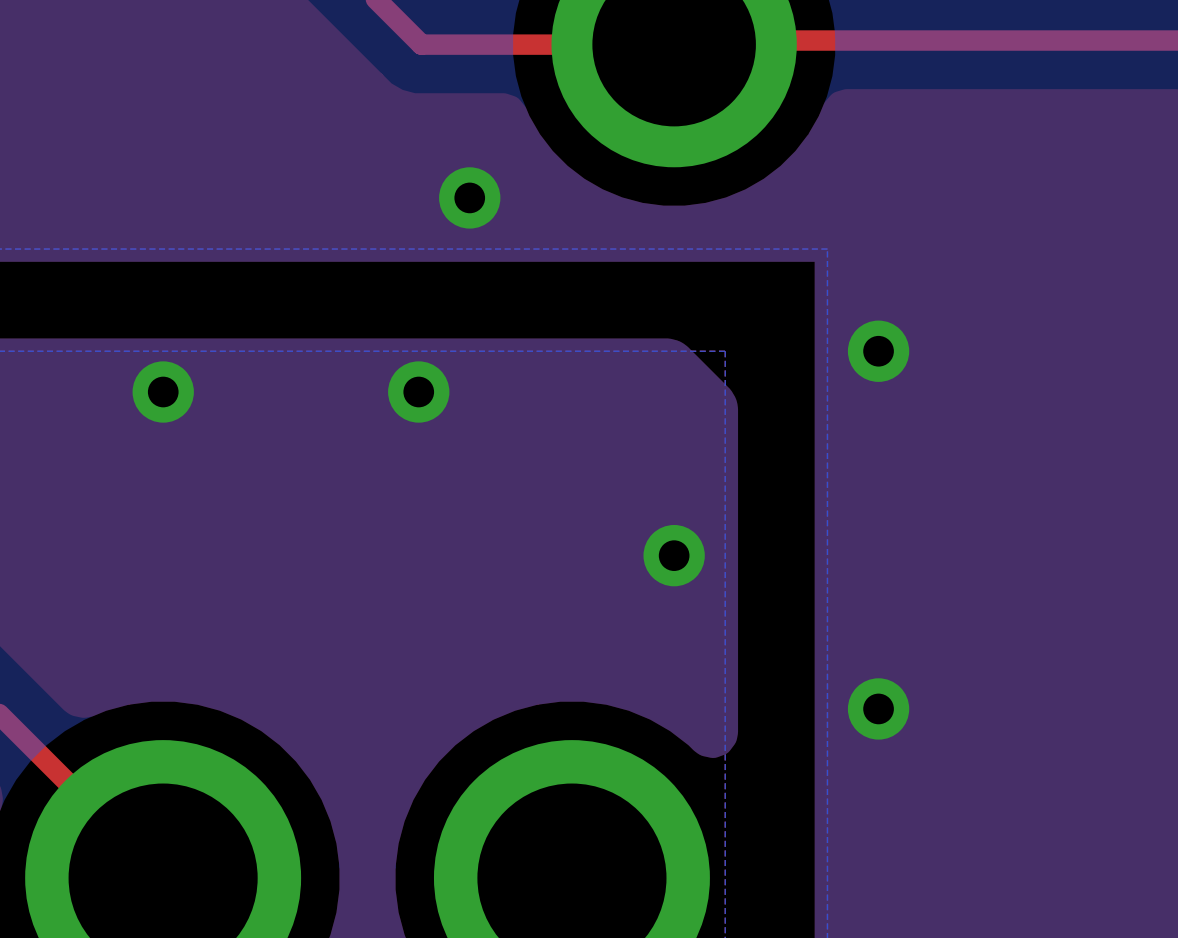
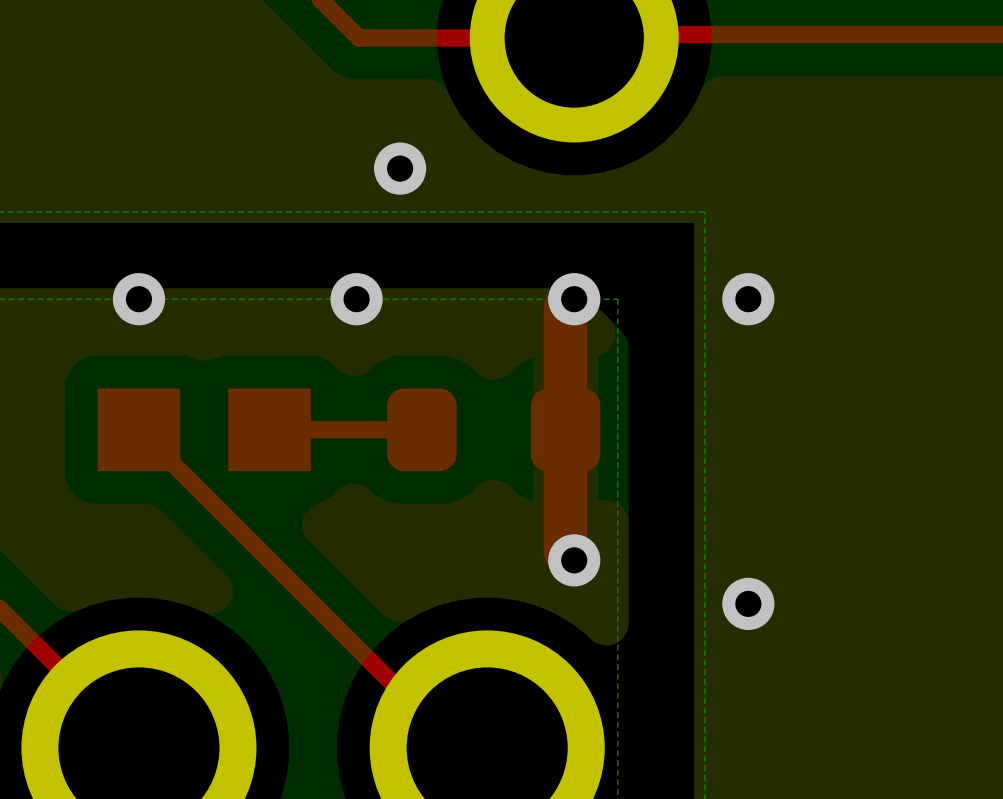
top track: none -> (574, 299) (565, 307) (565, 551) (574, 560)
via: none -> (574, 299)
via position: (163, 392) -> (138, 299)
via position: (418, 392) -> (356, 299)
top track: none -> (138, 429) (457, 747) (487, 747)
part: none -> (204, 429)
top track: none -> (421, 429) (269, 429)
part: none -> (493, 429)
via: (674, 555) -> none
via: none -> (574, 560)

